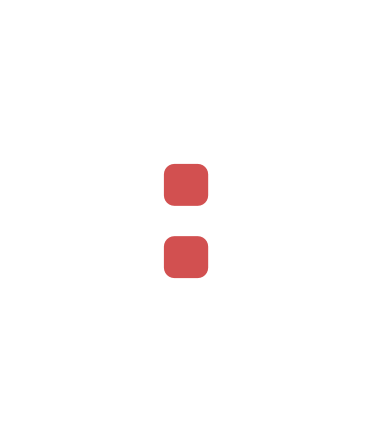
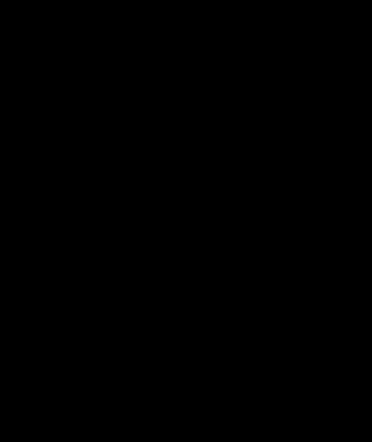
part: (186, 220) -> none

